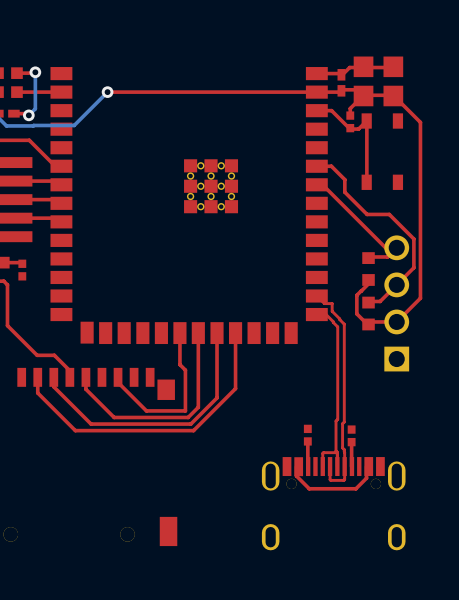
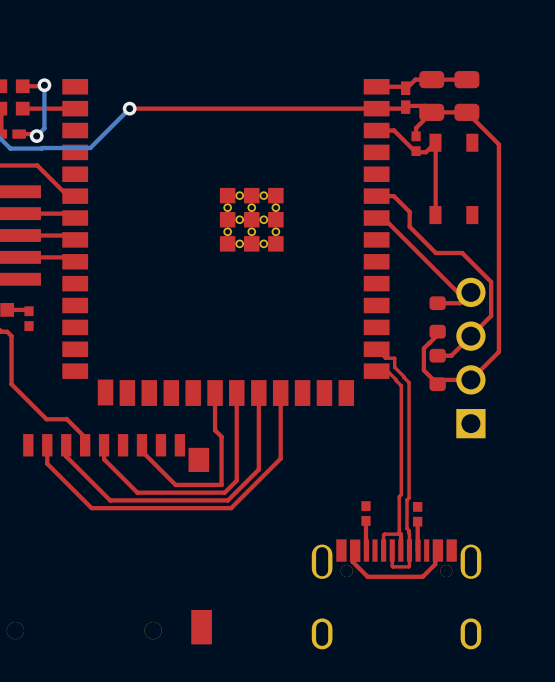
part footprint: [353, 56, 374, 107] -> [419, 71, 445, 121]
part footprint: [383, 56, 404, 107] -> [454, 71, 480, 121]
part footprint: [362, 252, 375, 286] -> [429, 296, 446, 339]
part footprint: [362, 296, 375, 331] -> [429, 348, 446, 392]

